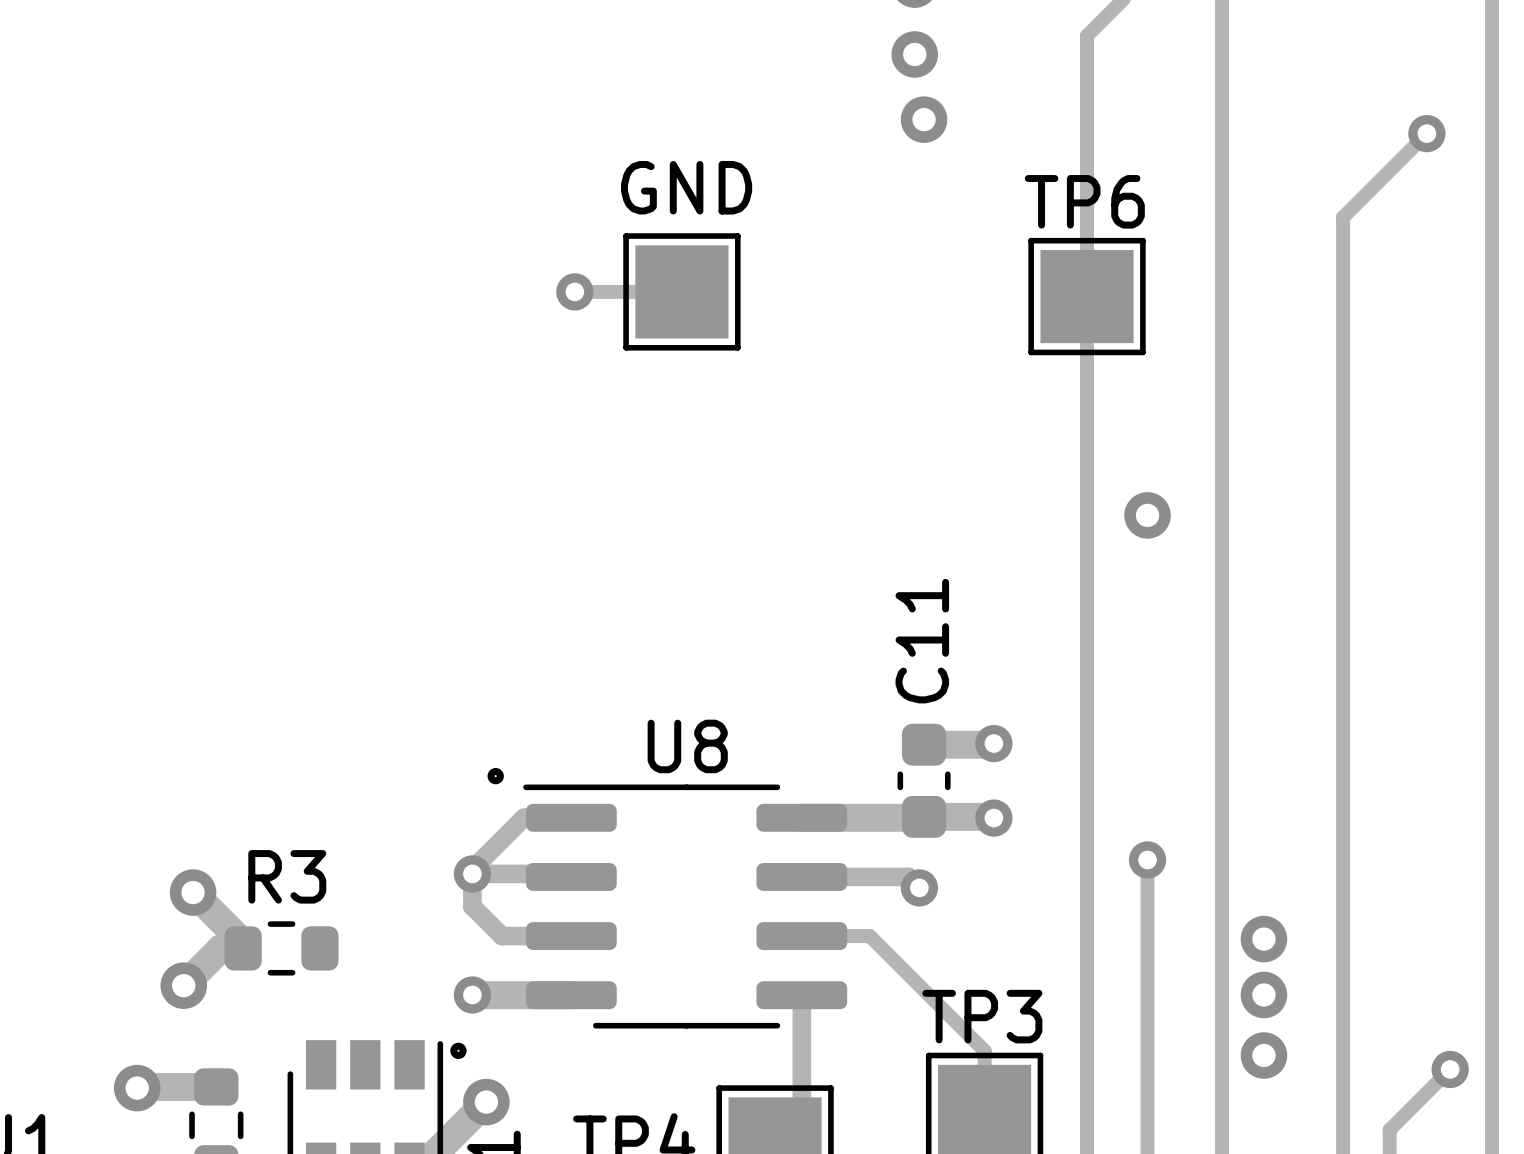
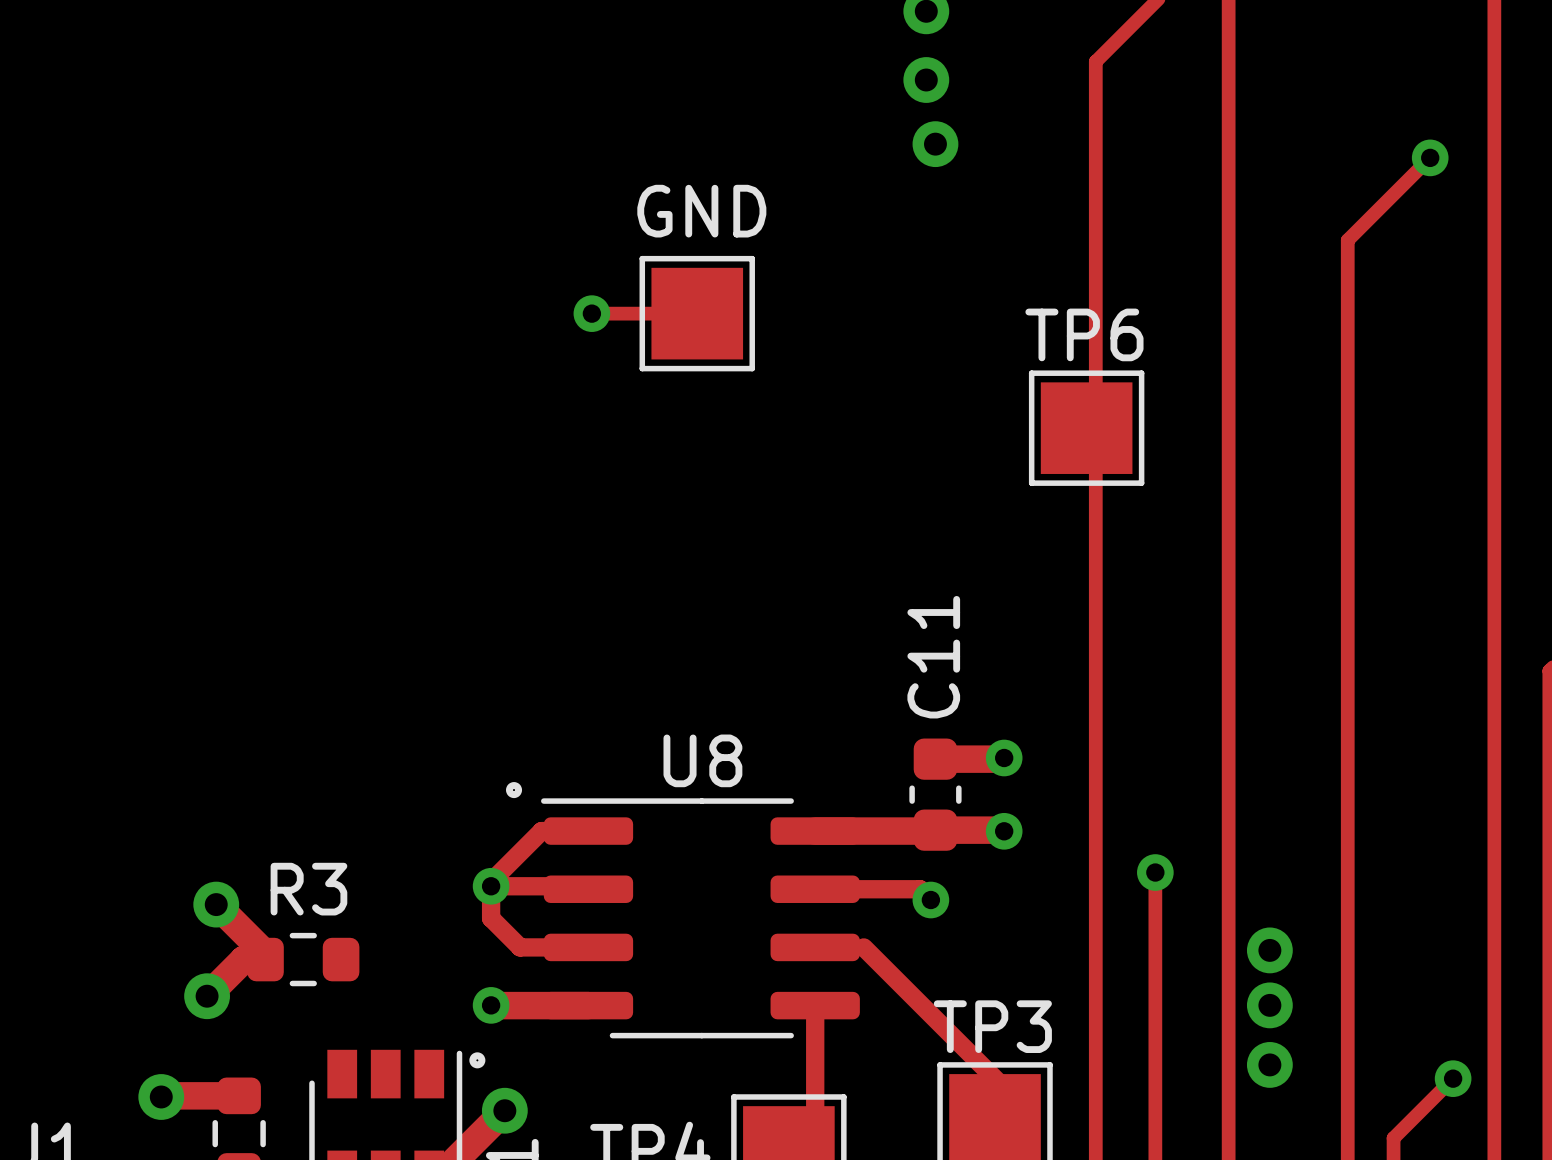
TP6 position: (1087, 296) -> (1086, 428)
via: (1147, 515) -> none
track: (851, 936) (869, 936) (984, 1050) (984, 1069) -> (863, 947) (1017, 1101) (1017, 1142)

